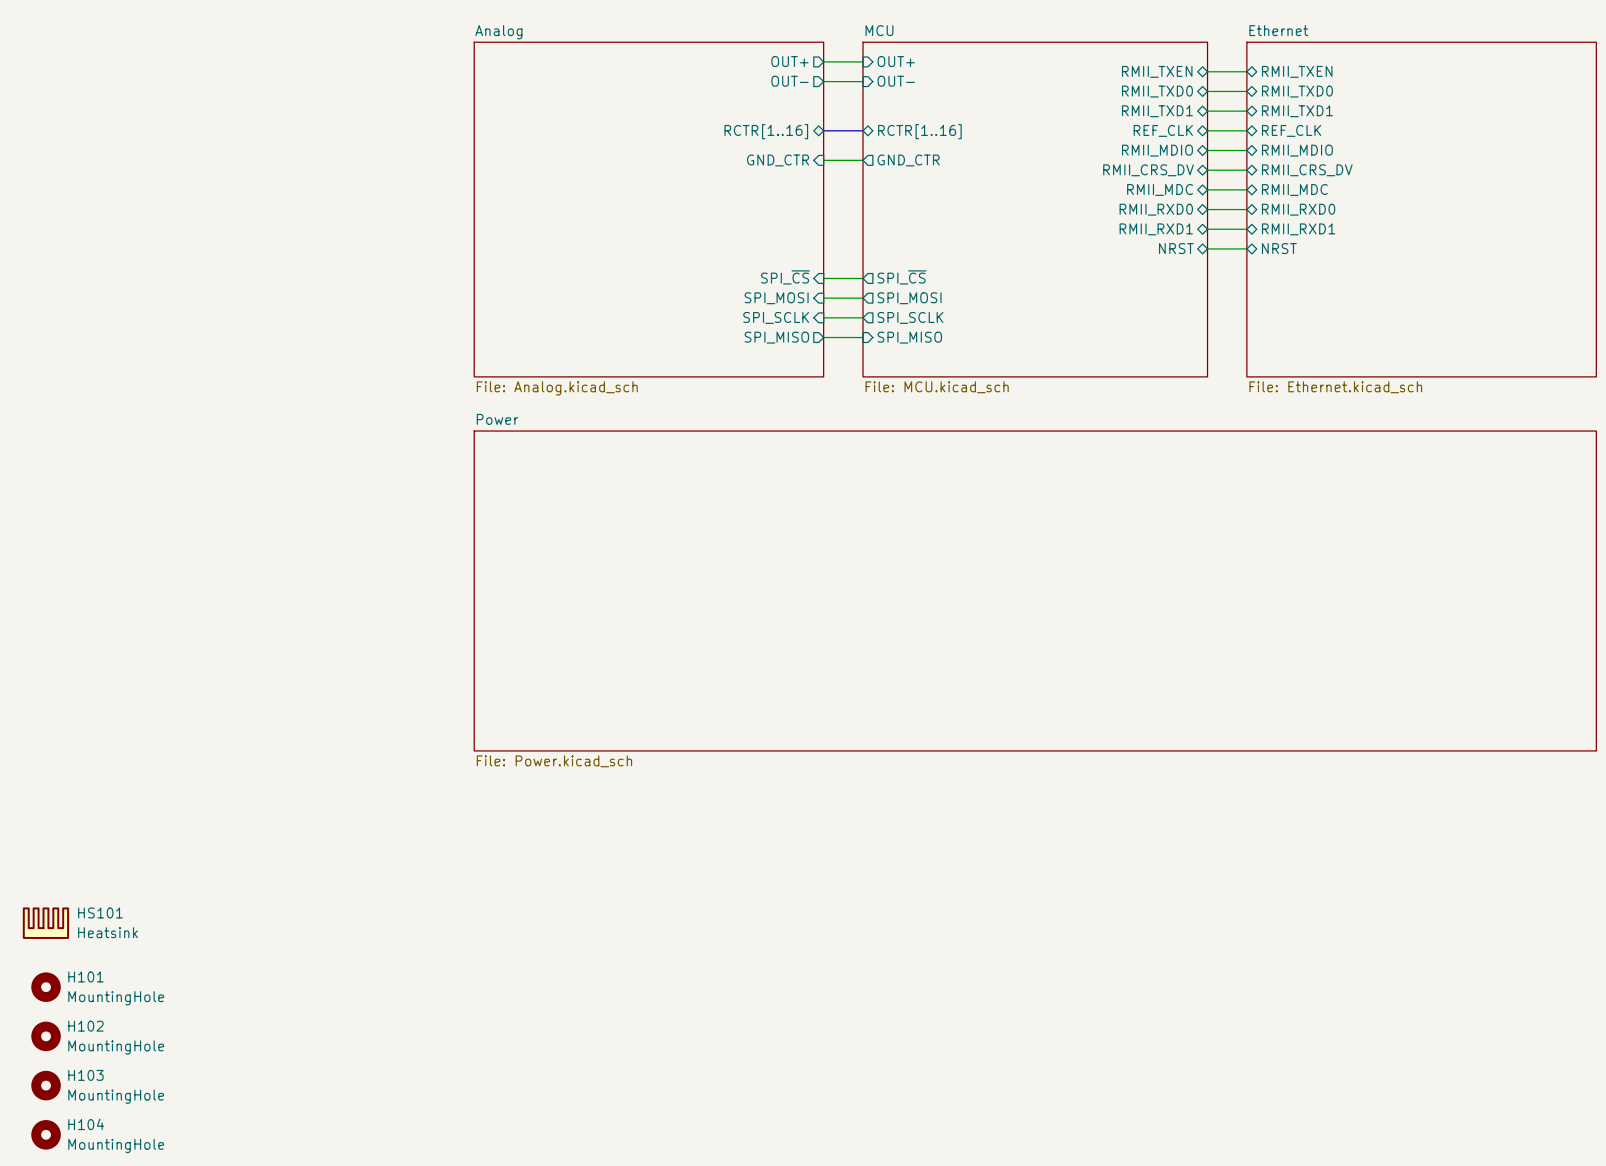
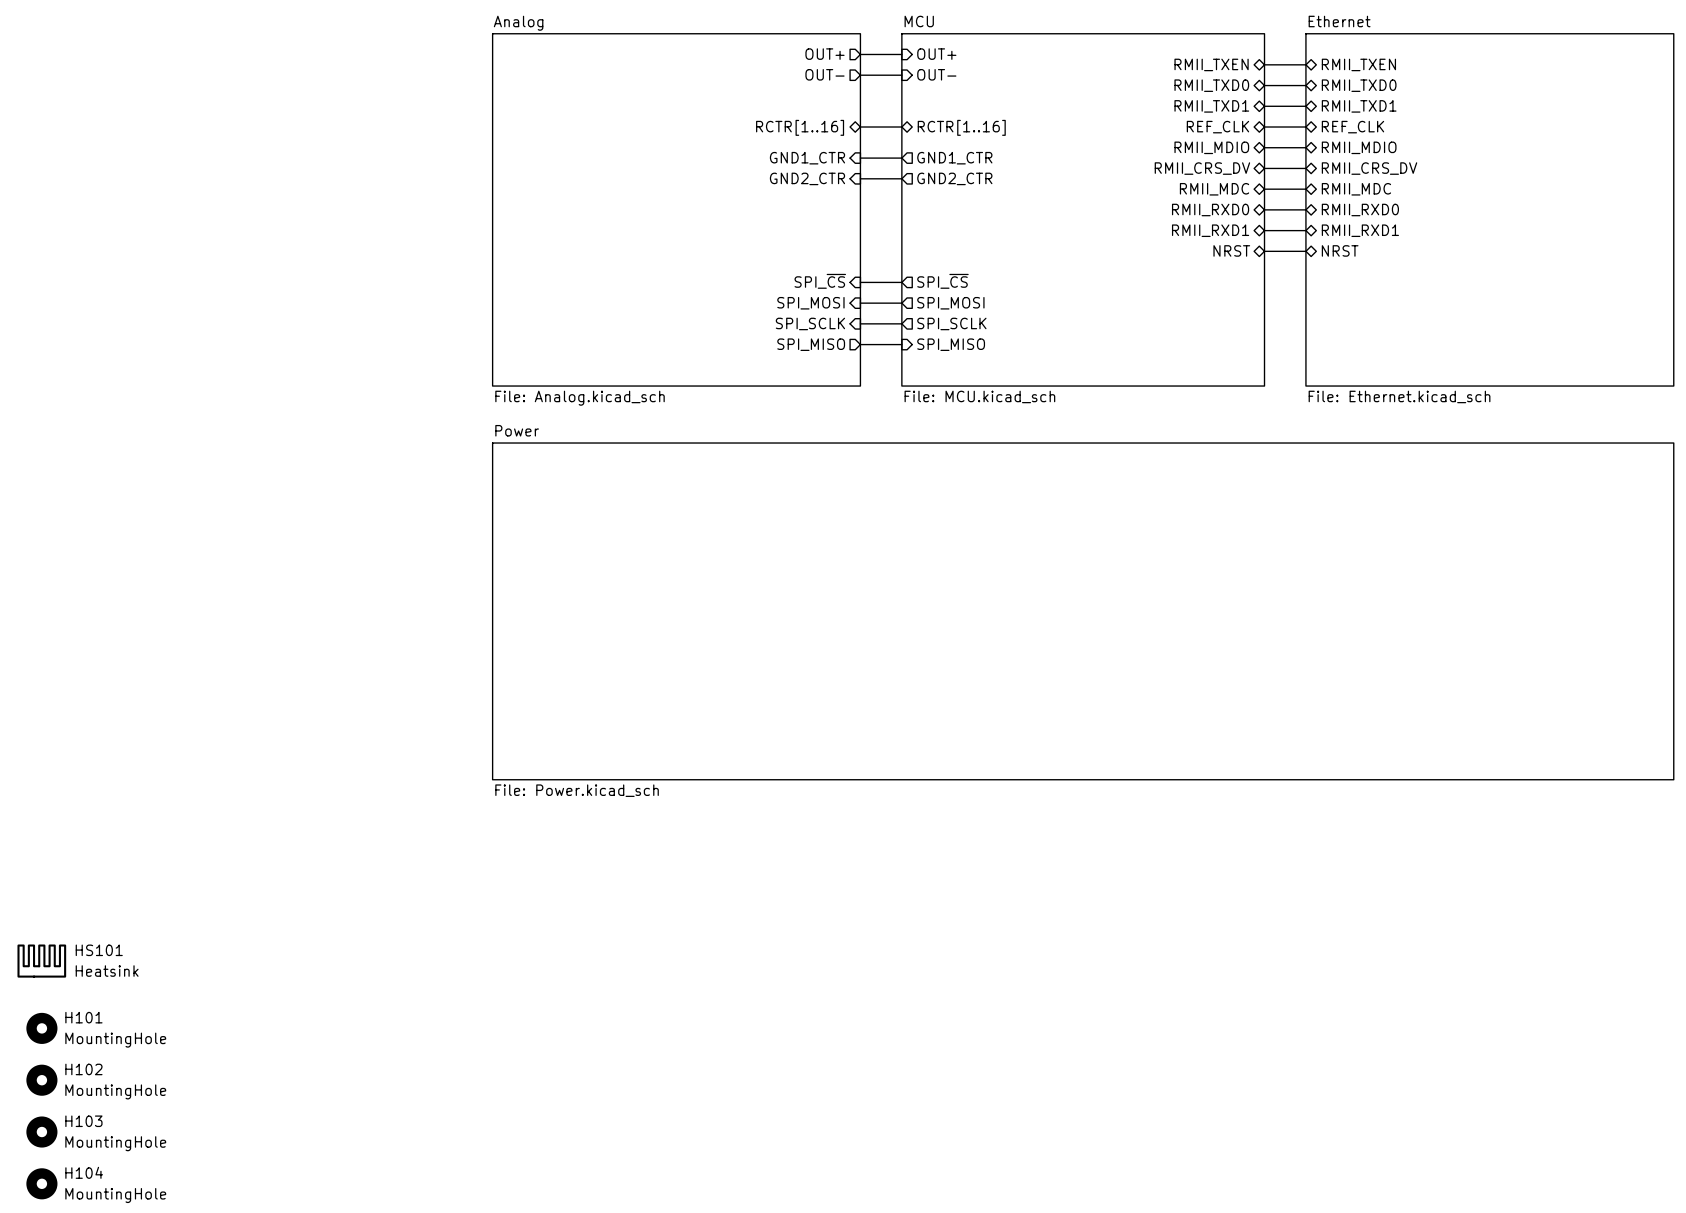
sheet pin: GND_CTR (778, 160) -> GND1_CTR (807, 158)
sheet pin: GND_CTR (908, 160) -> GND1_CTR (954, 158)
sheet pin: none -> GND2_CTR (807, 178)
wire: none -> (860, 178) (901, 178)
sheet pin: none -> GND2_CTR (954, 178)

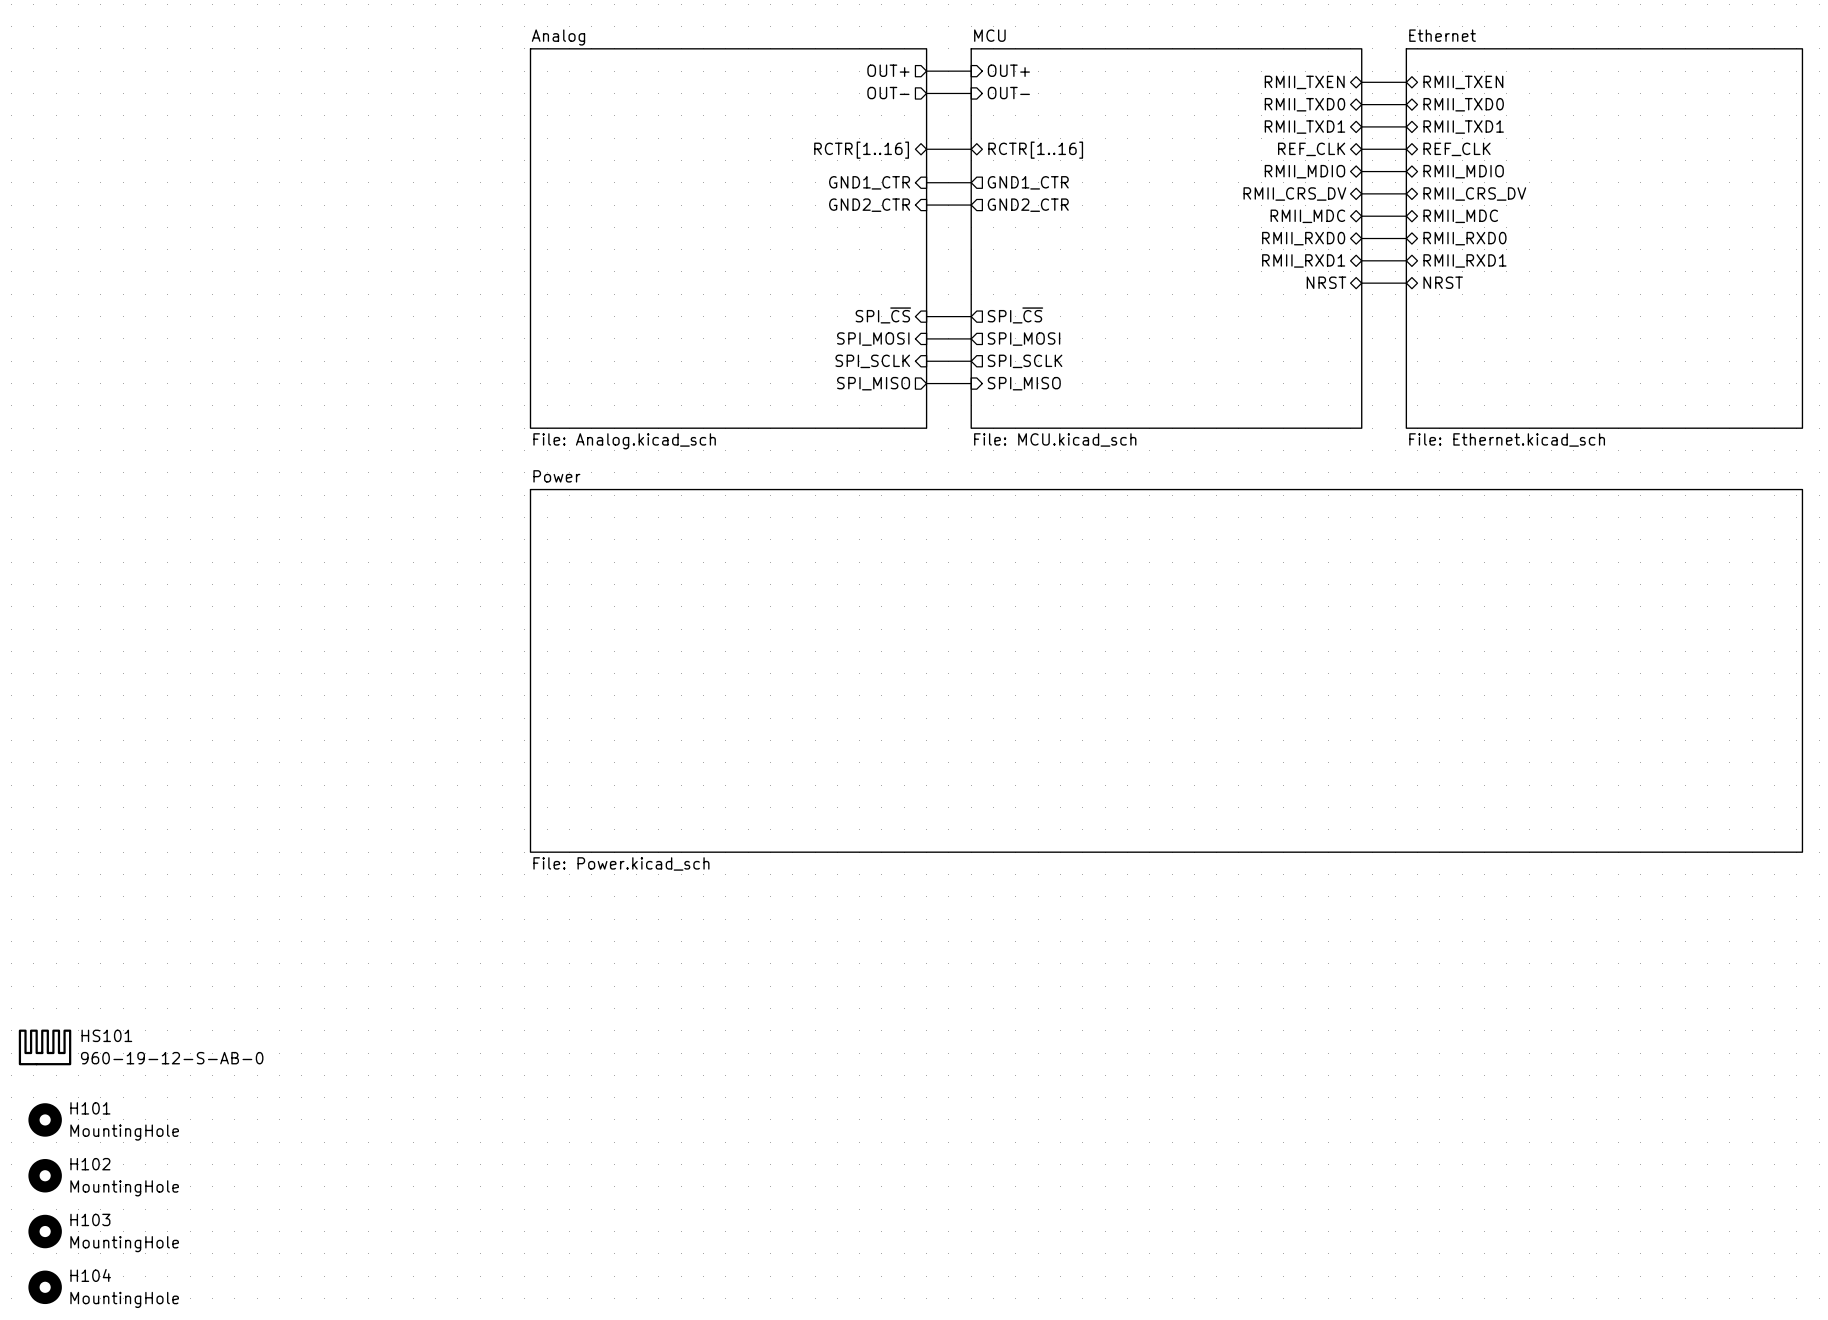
HS101 value: Heatsink (107, 971) -> 960-19-12-S-AB-0 (172, 1058)

